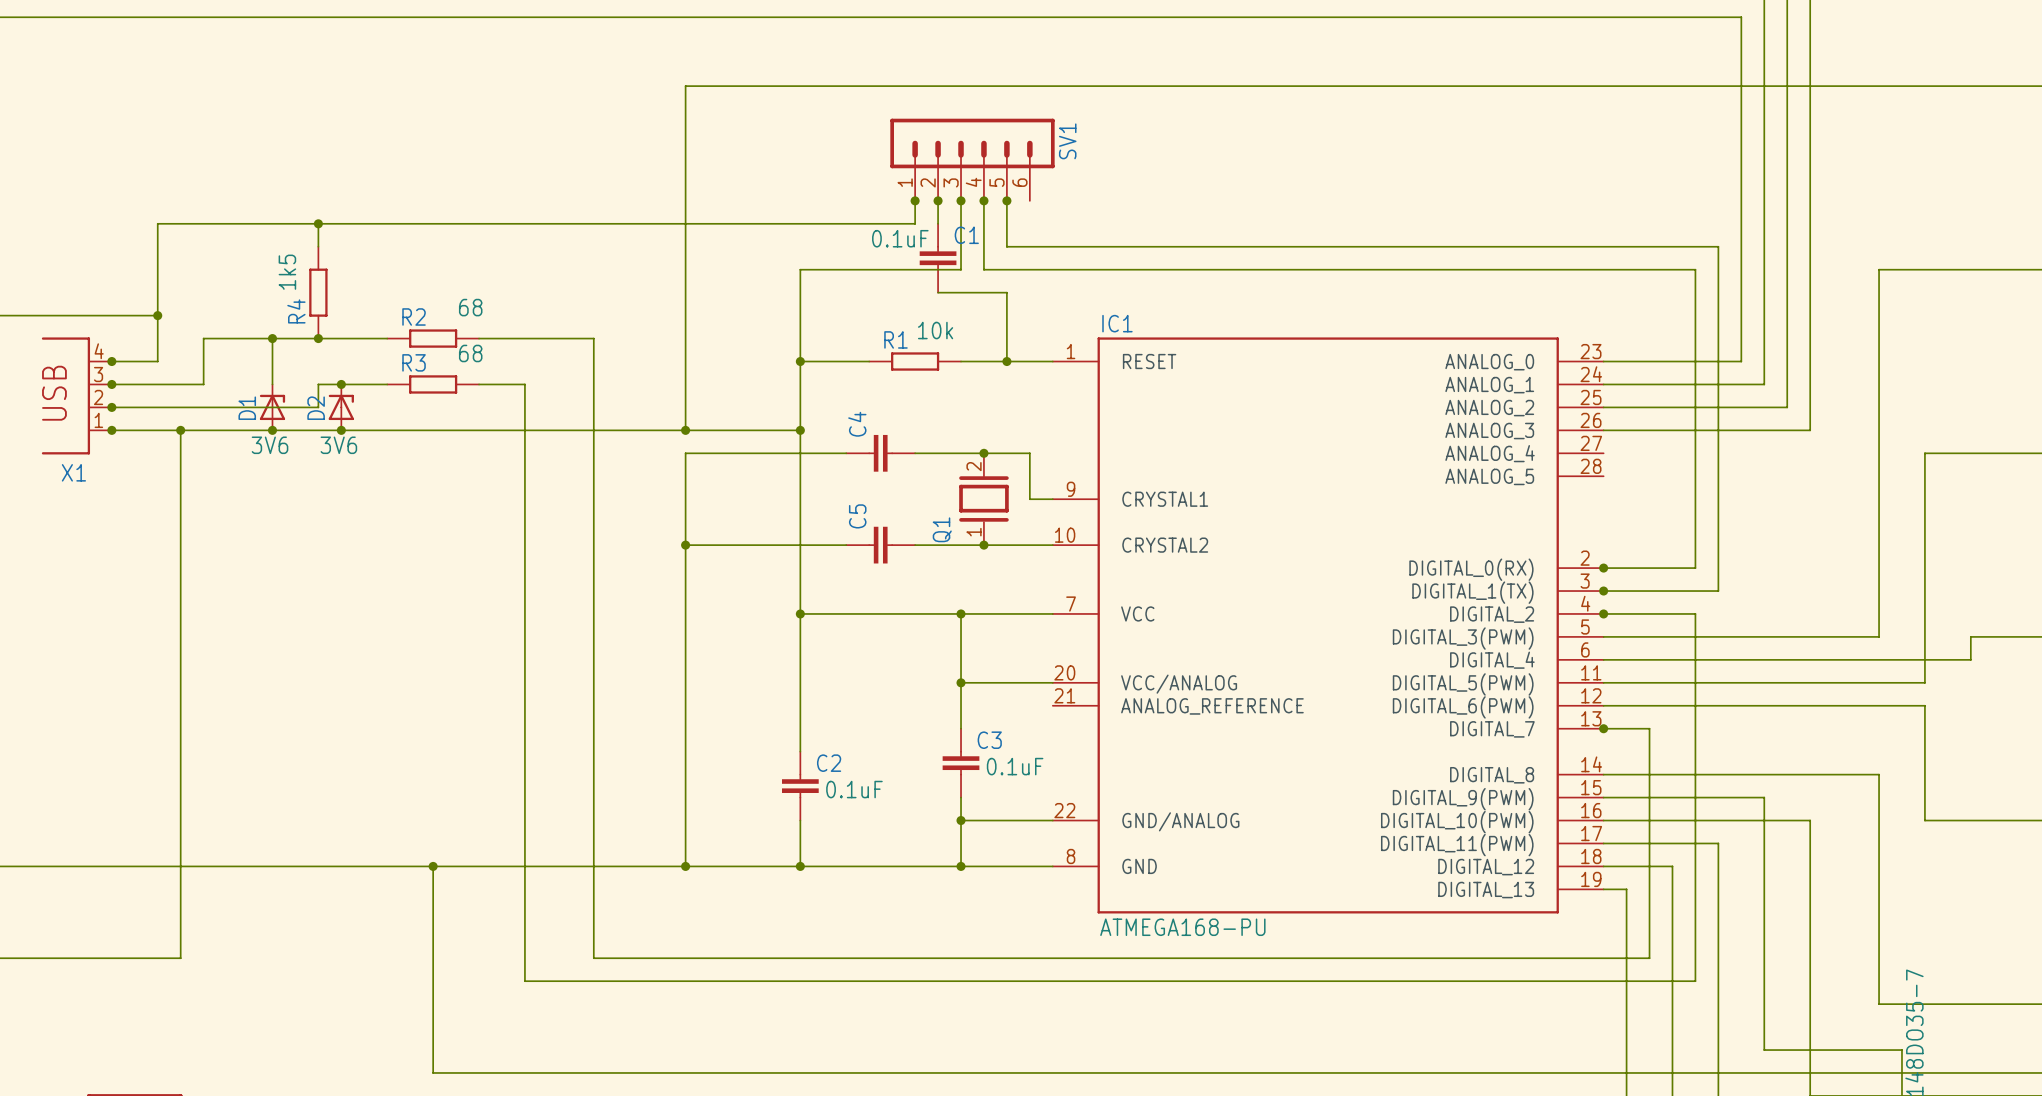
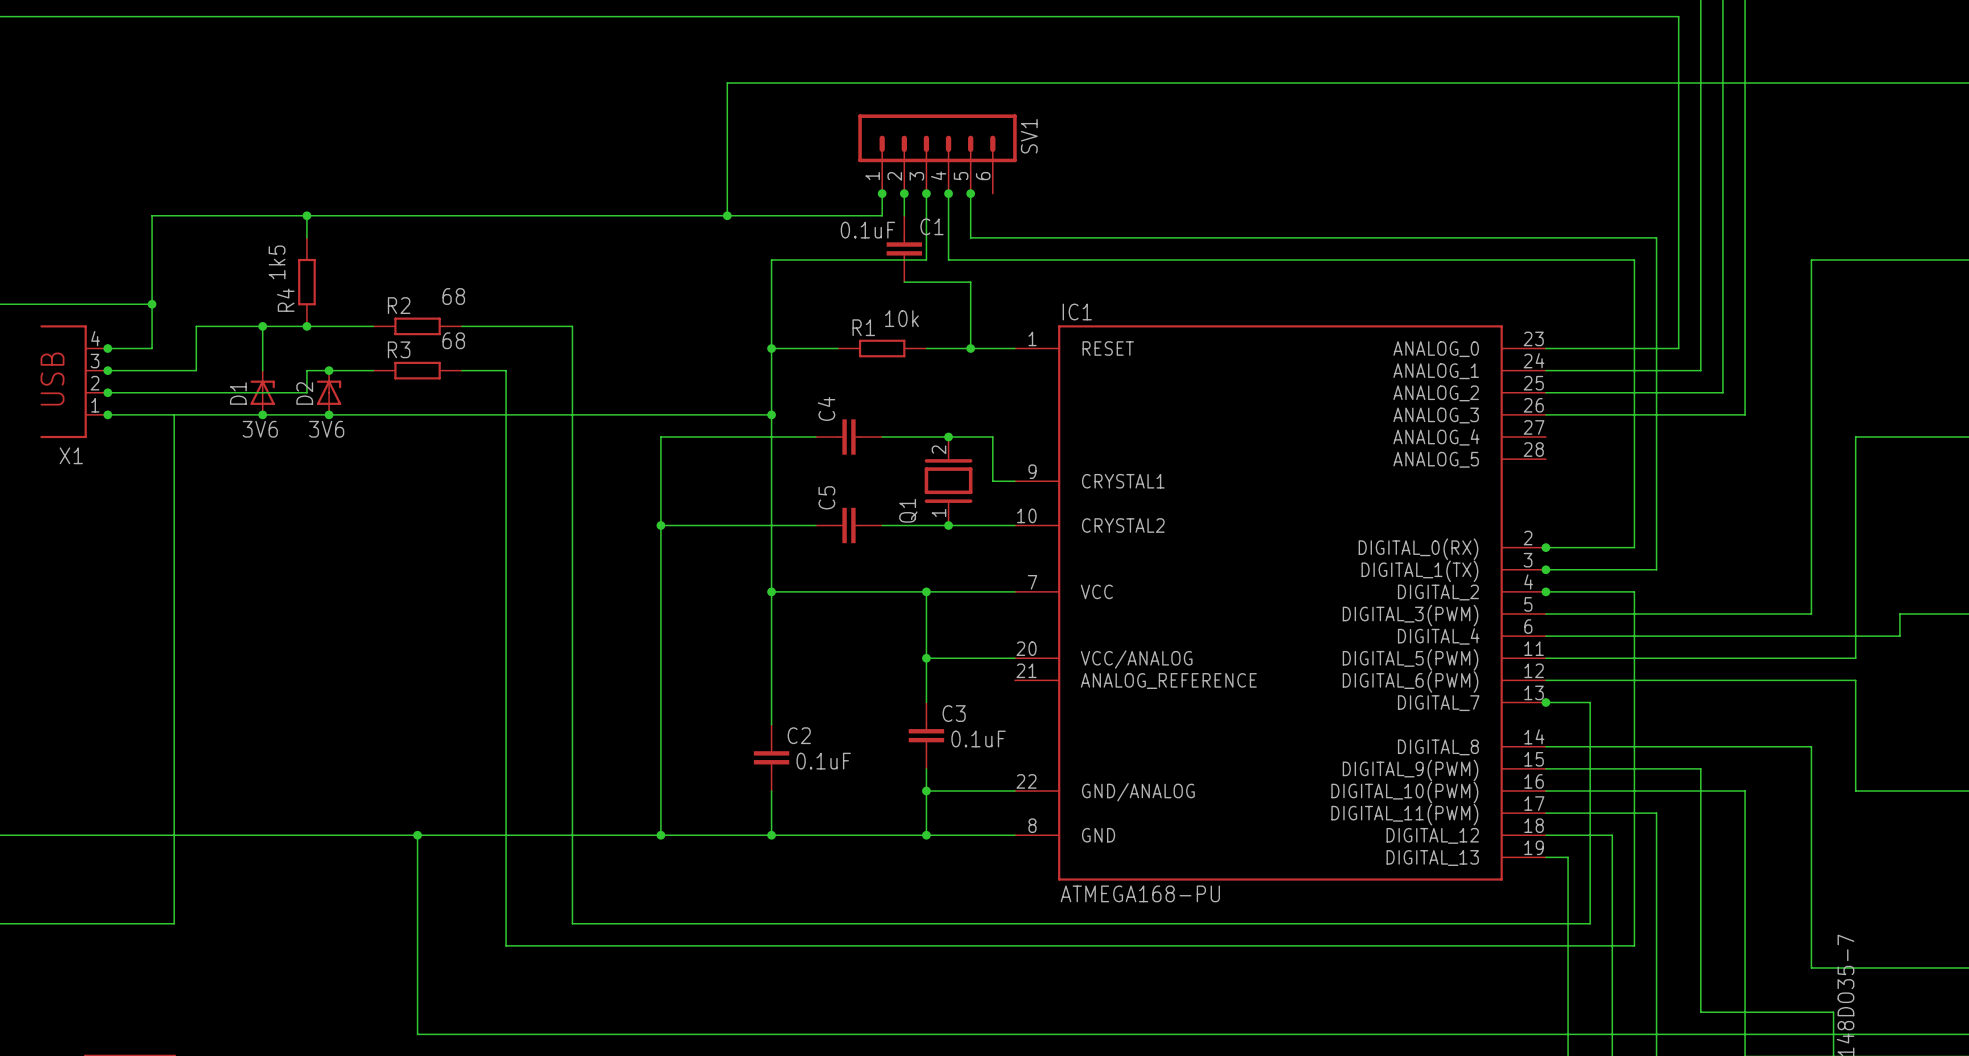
wire: (754, 86) (685, 86) (685, 430) -> (727, 83) (727, 215)
junction: none -> (727, 215)
junction: (180, 430) -> none
junction: (685, 430) -> none

